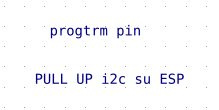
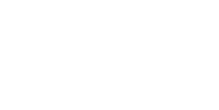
text: progtrm pin (95, 31) -> none
text: PULL UP i2c su ESP (109, 78) -> none

